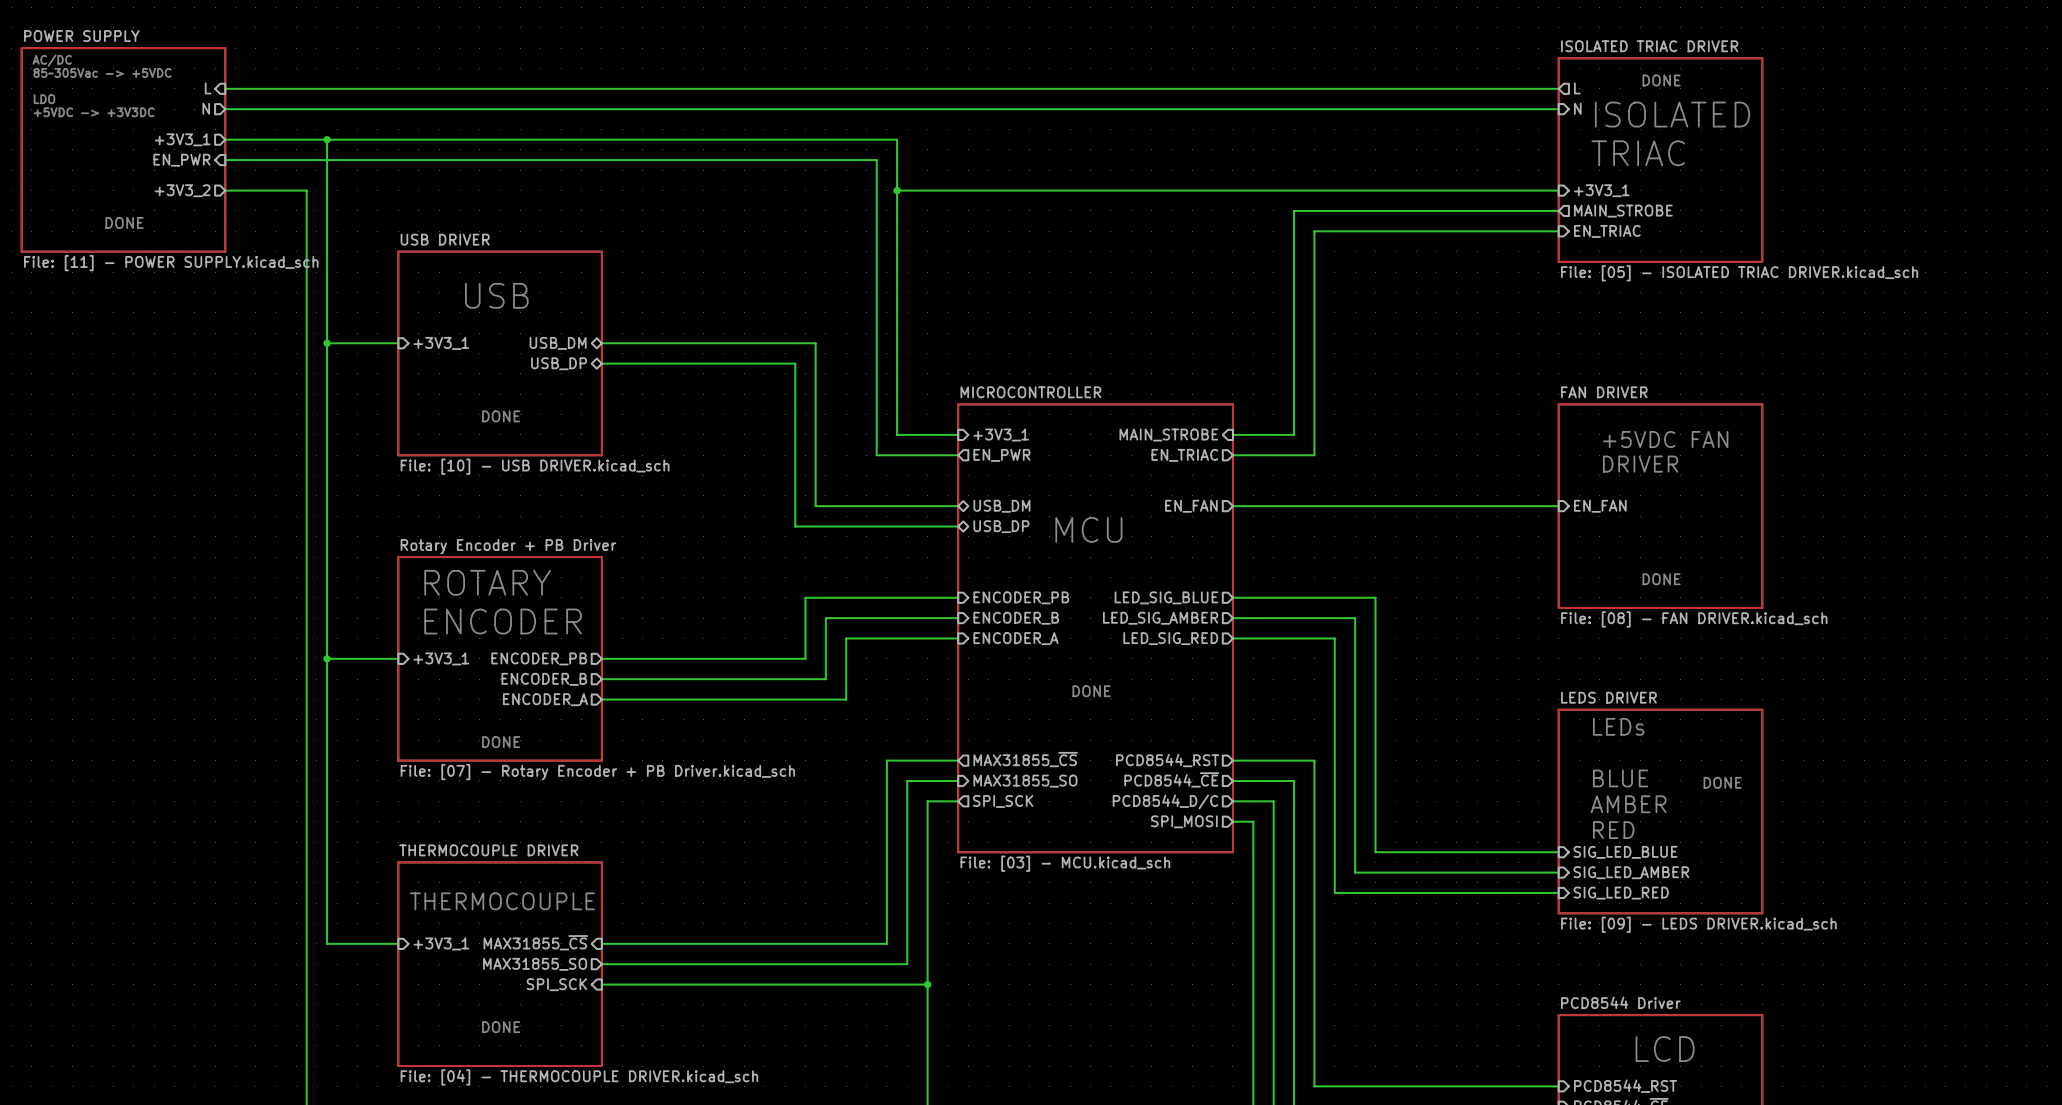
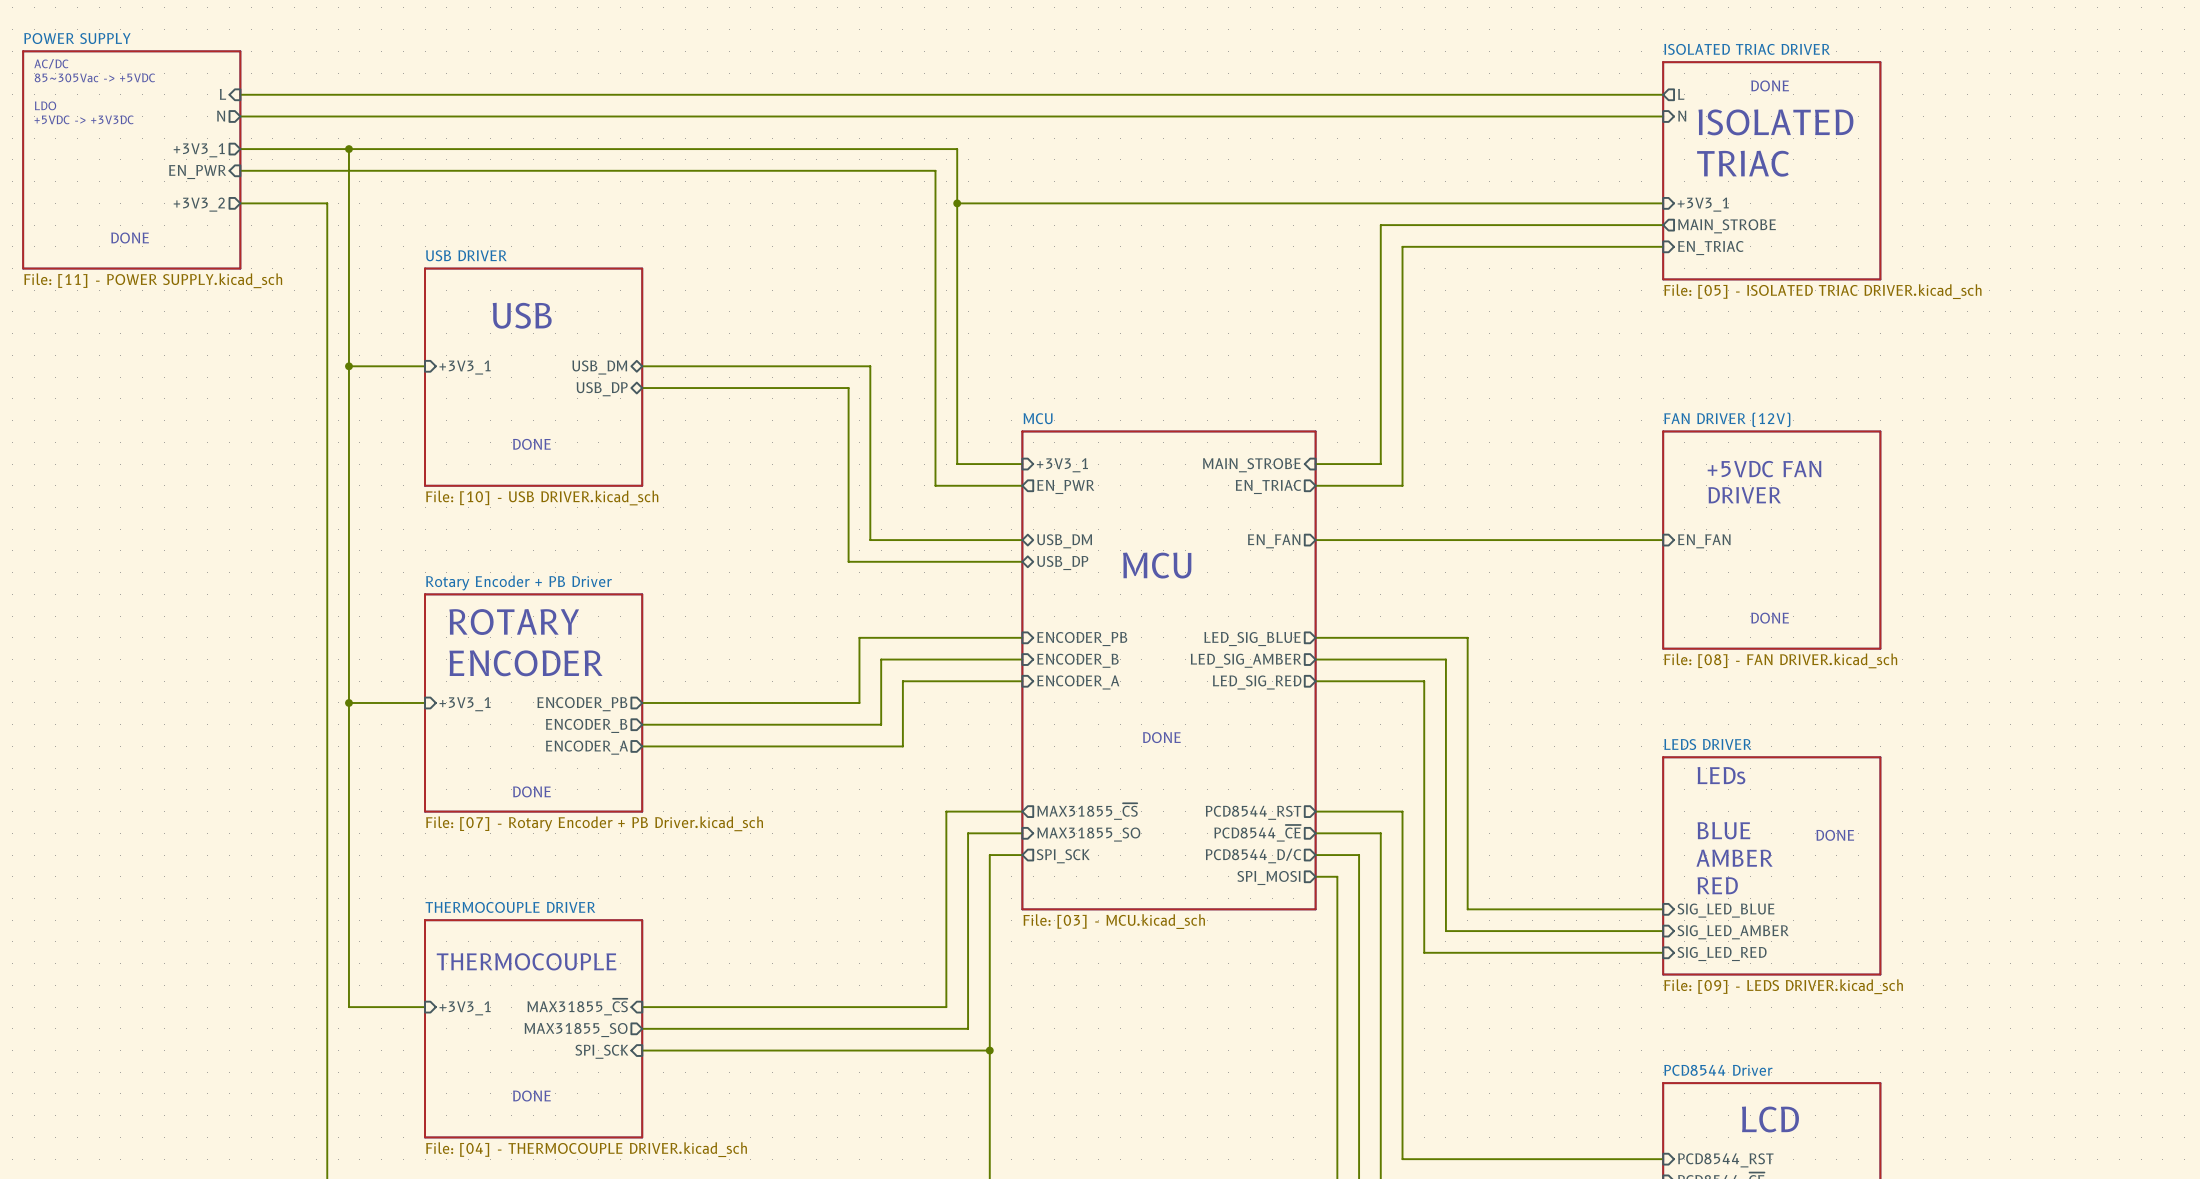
sheet MICROCONTROLLER name: MICROCONTROLLER (1030, 392) -> MCU (1038, 418)
sheet FAN DRIVER name: FAN DRIVER (1604, 392) -> FAN DRIVER (12V) (1727, 419)

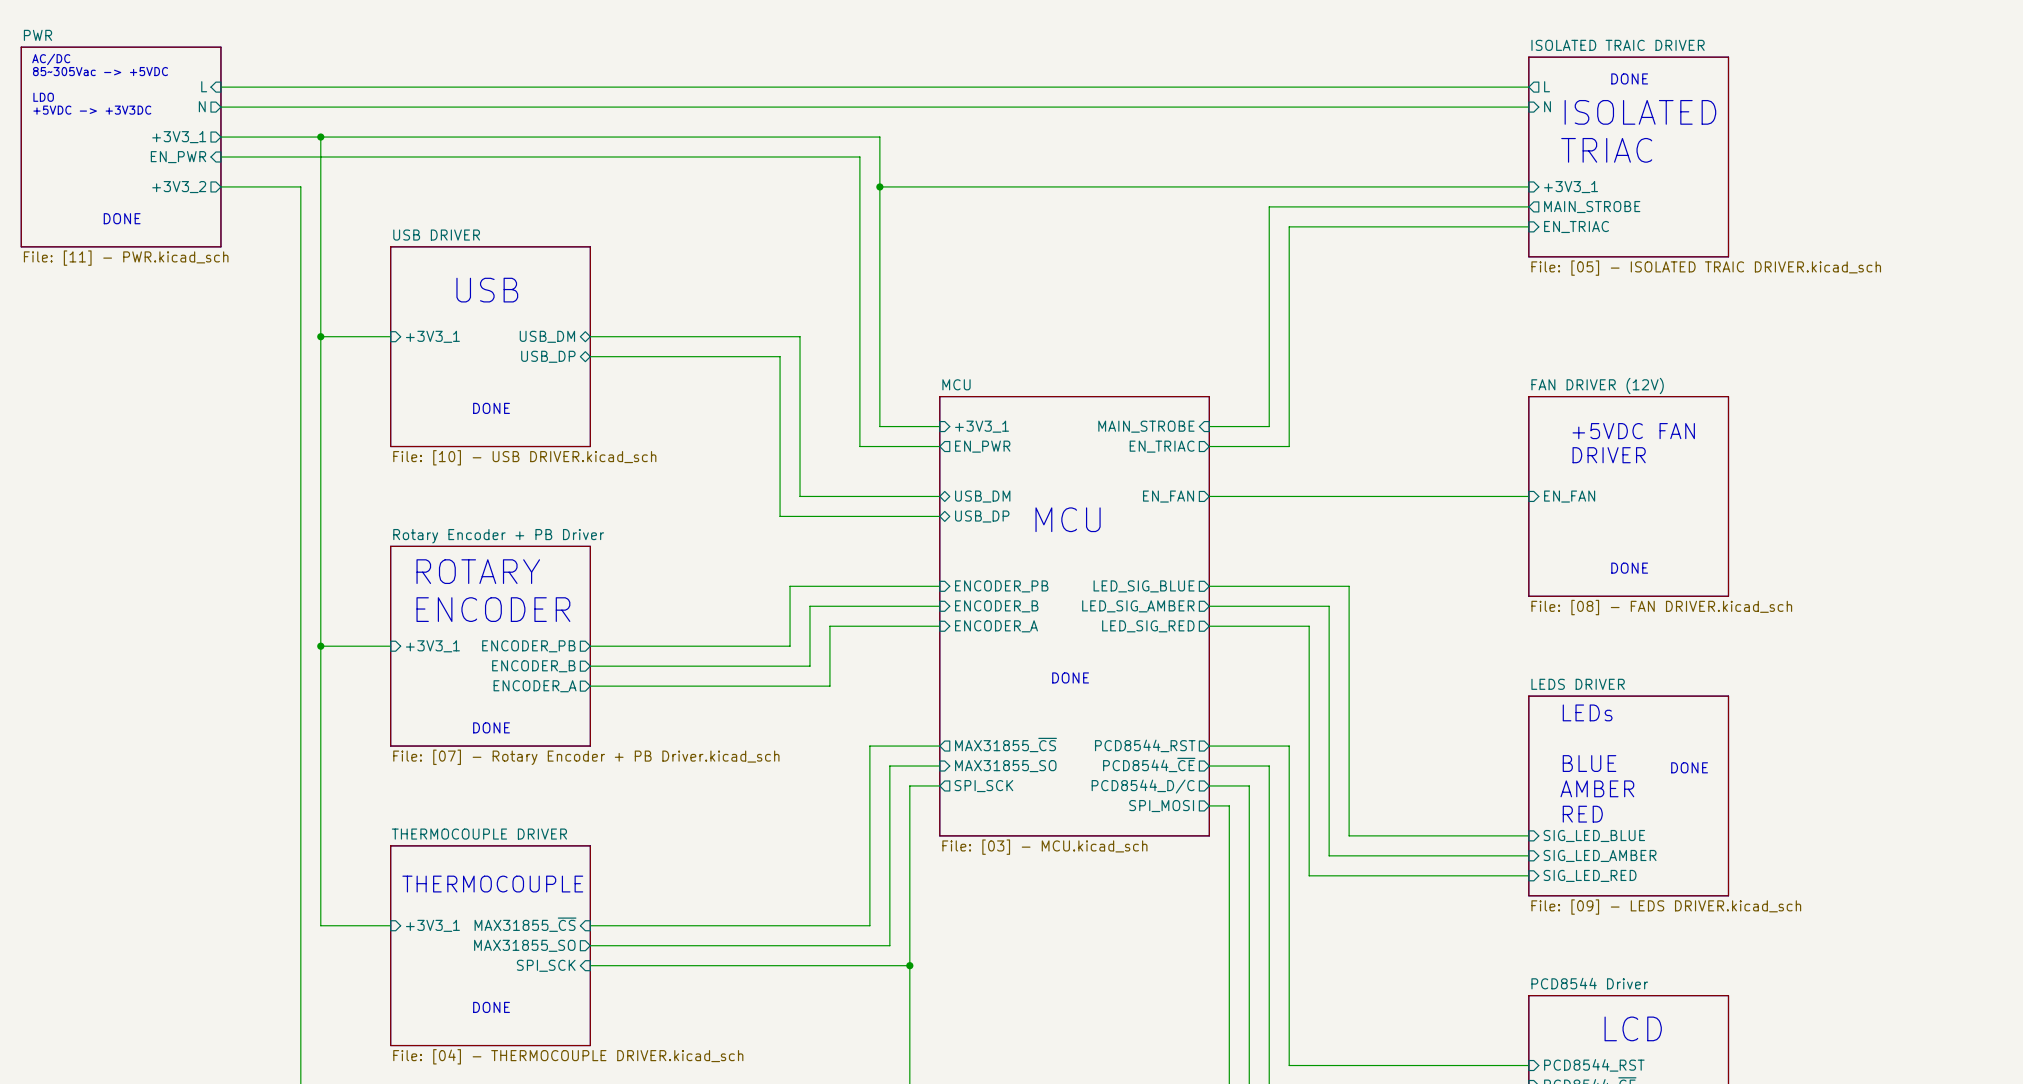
sheet POWER SUPPLY name: POWER SUPPLY (77, 38) -> PWR (37, 35)
sheet ISOLATED TRIAC DRIVER name: ISOLATED TRIAC DRIVER (1747, 49) -> ISOLATED TRAIC DRIVER (1618, 45)
sheet POWER SUPPLY value: File: [11] - POWER SUPPLY.kicad_sch (153, 280) -> File: [11] - PWR.kicad_sch (126, 258)
sheet ISOLATED TRIAC DRIVER value: File: [05] - ISOLATED TRIAC DRIVER.kicad_sch (1822, 291) -> File: [05] - ISOLATED TRAIC DRIVER.kicad_sch (1706, 268)

